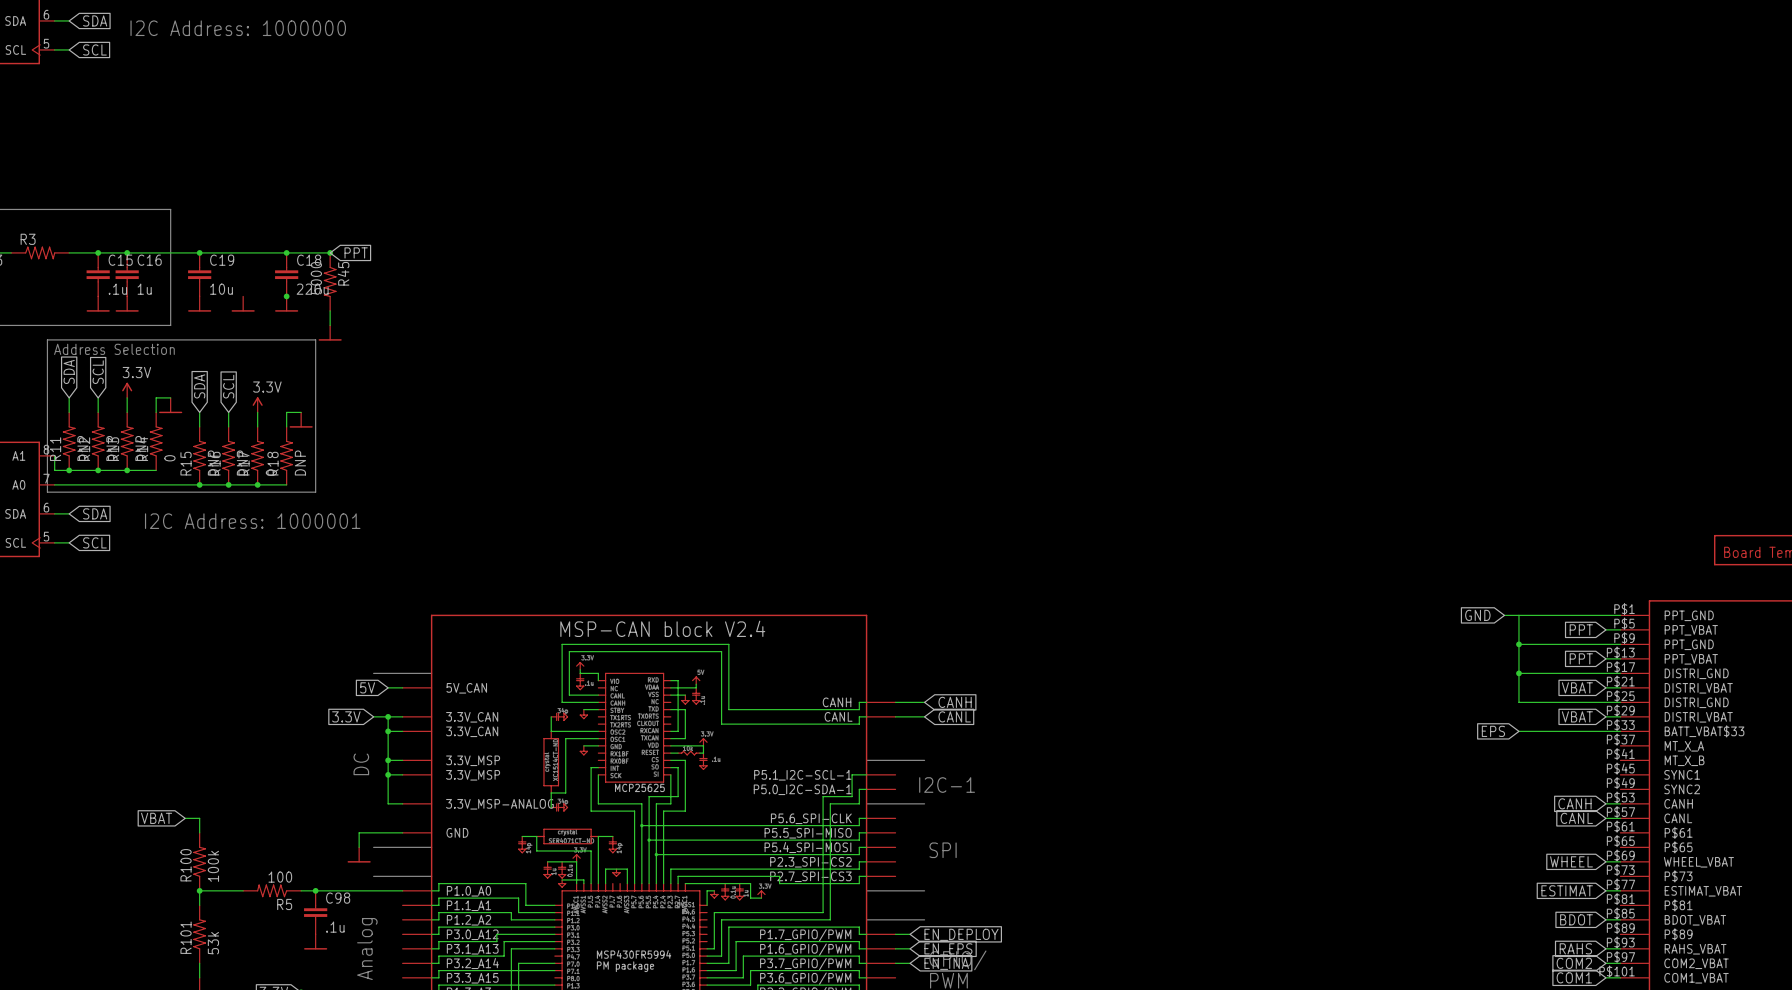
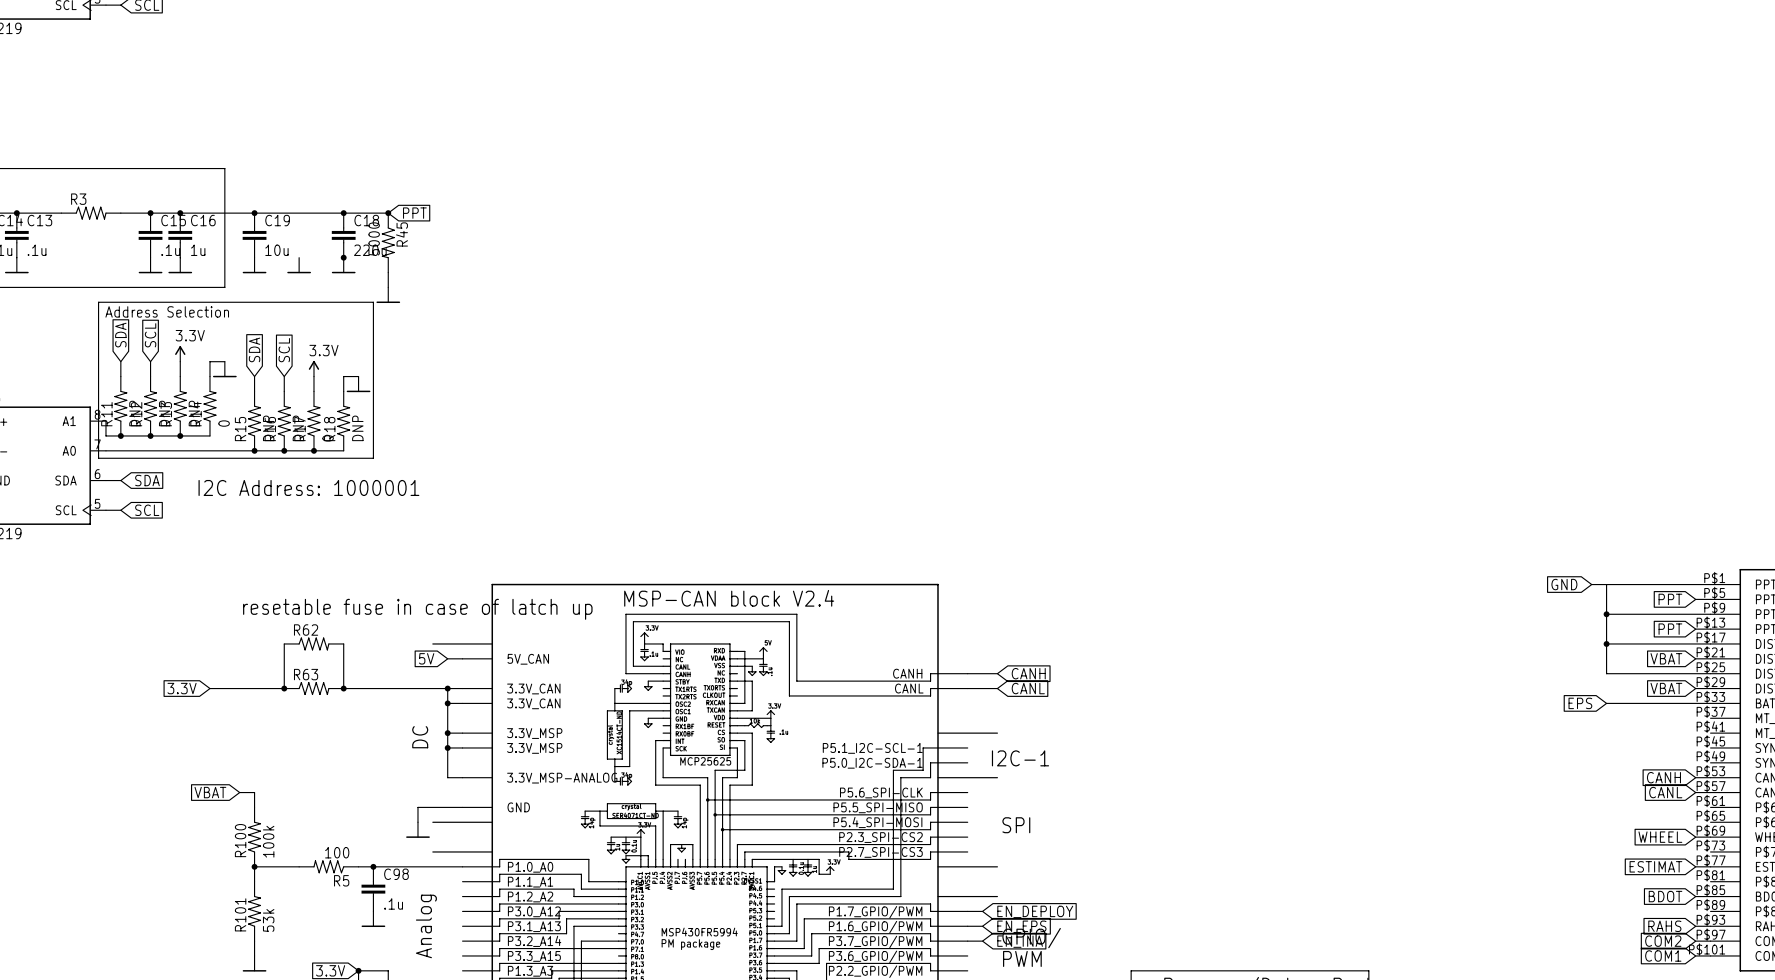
text: none -> resetable fuse in case of latch up (417, 609)
wire: none -> (284, 643) (284, 688) (209, 688)
R62: none -> (313, 643)
wire: none -> (343, 643) (343, 688) (432, 688)
global label: none -> 3.3V (182, 688)
junction: none -> (284, 688)
R63: none -> (313, 688)
junction: none -> (343, 688)
global label: 3.3V (346, 716) -> none

